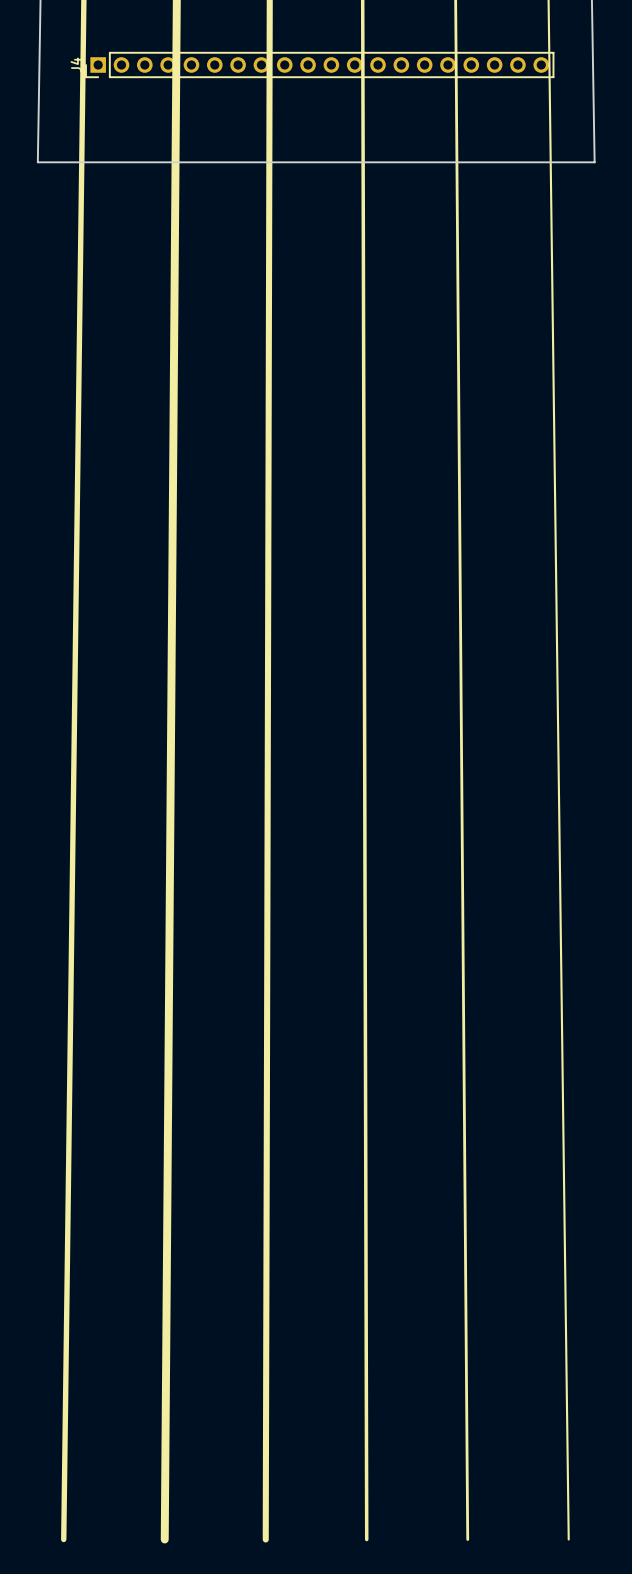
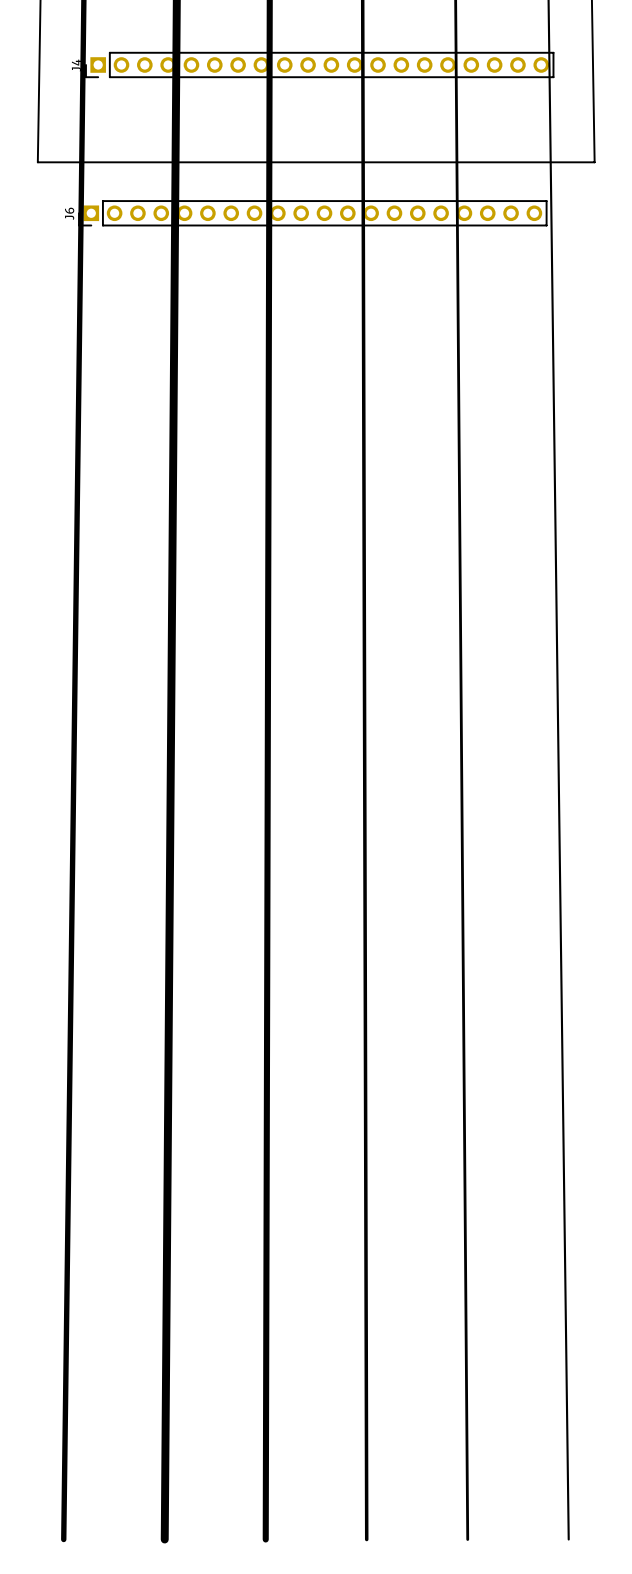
J6: none -> (312, 213)

